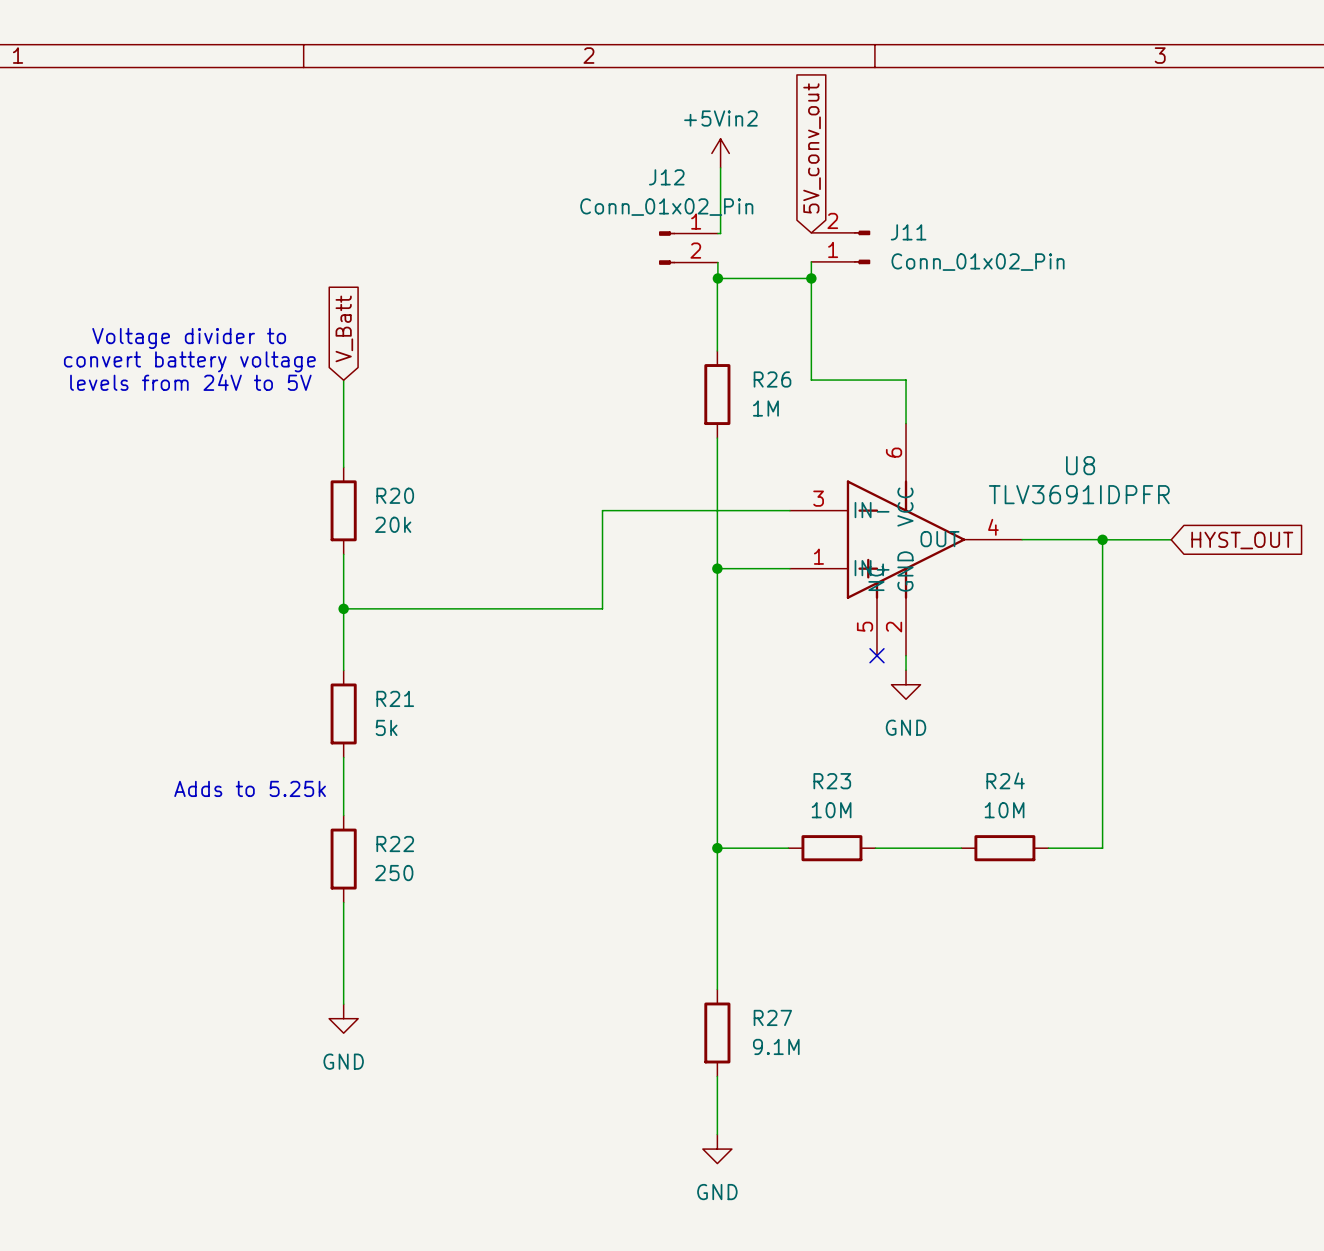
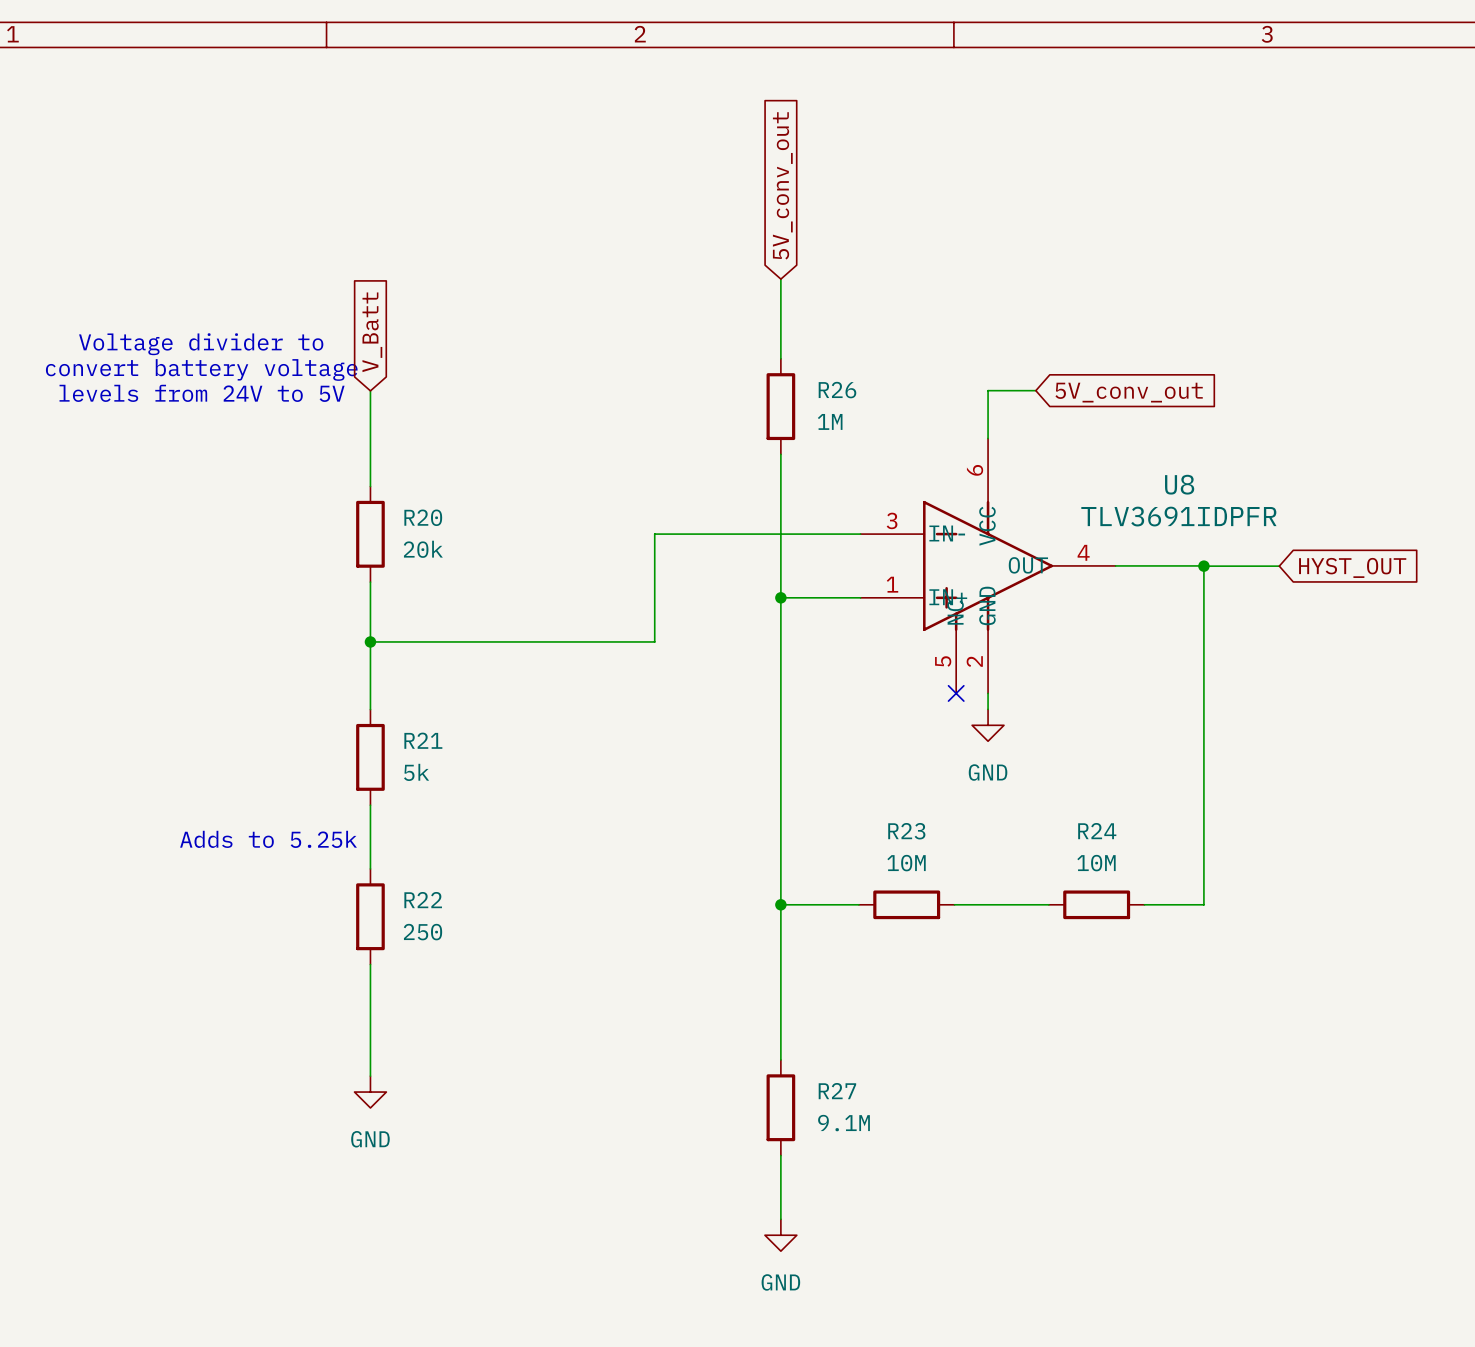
global label: 5V_conv_out (812, 148) -> none
power symbol: +5Vin2 (720, 153) -> none
wire: (720, 167) (720, 233) (717, 233) -> none
global label: none -> 5V_conv_out (782, 185)
J11: Conn_01x02_Pin (840, 247) -> none
J12: Conn_01x02_Pin (688, 248) -> none
wire: (811, 261) (811, 380) (906, 380) -> (1035, 390) (988, 390)
wire: (717, 262) (717, 278) -> none
wire: (717, 278) (811, 278) -> none
junction: (717, 278) -> none
junction: (811, 278) -> none
global label: none -> 5V_conv_out (1129, 392)

